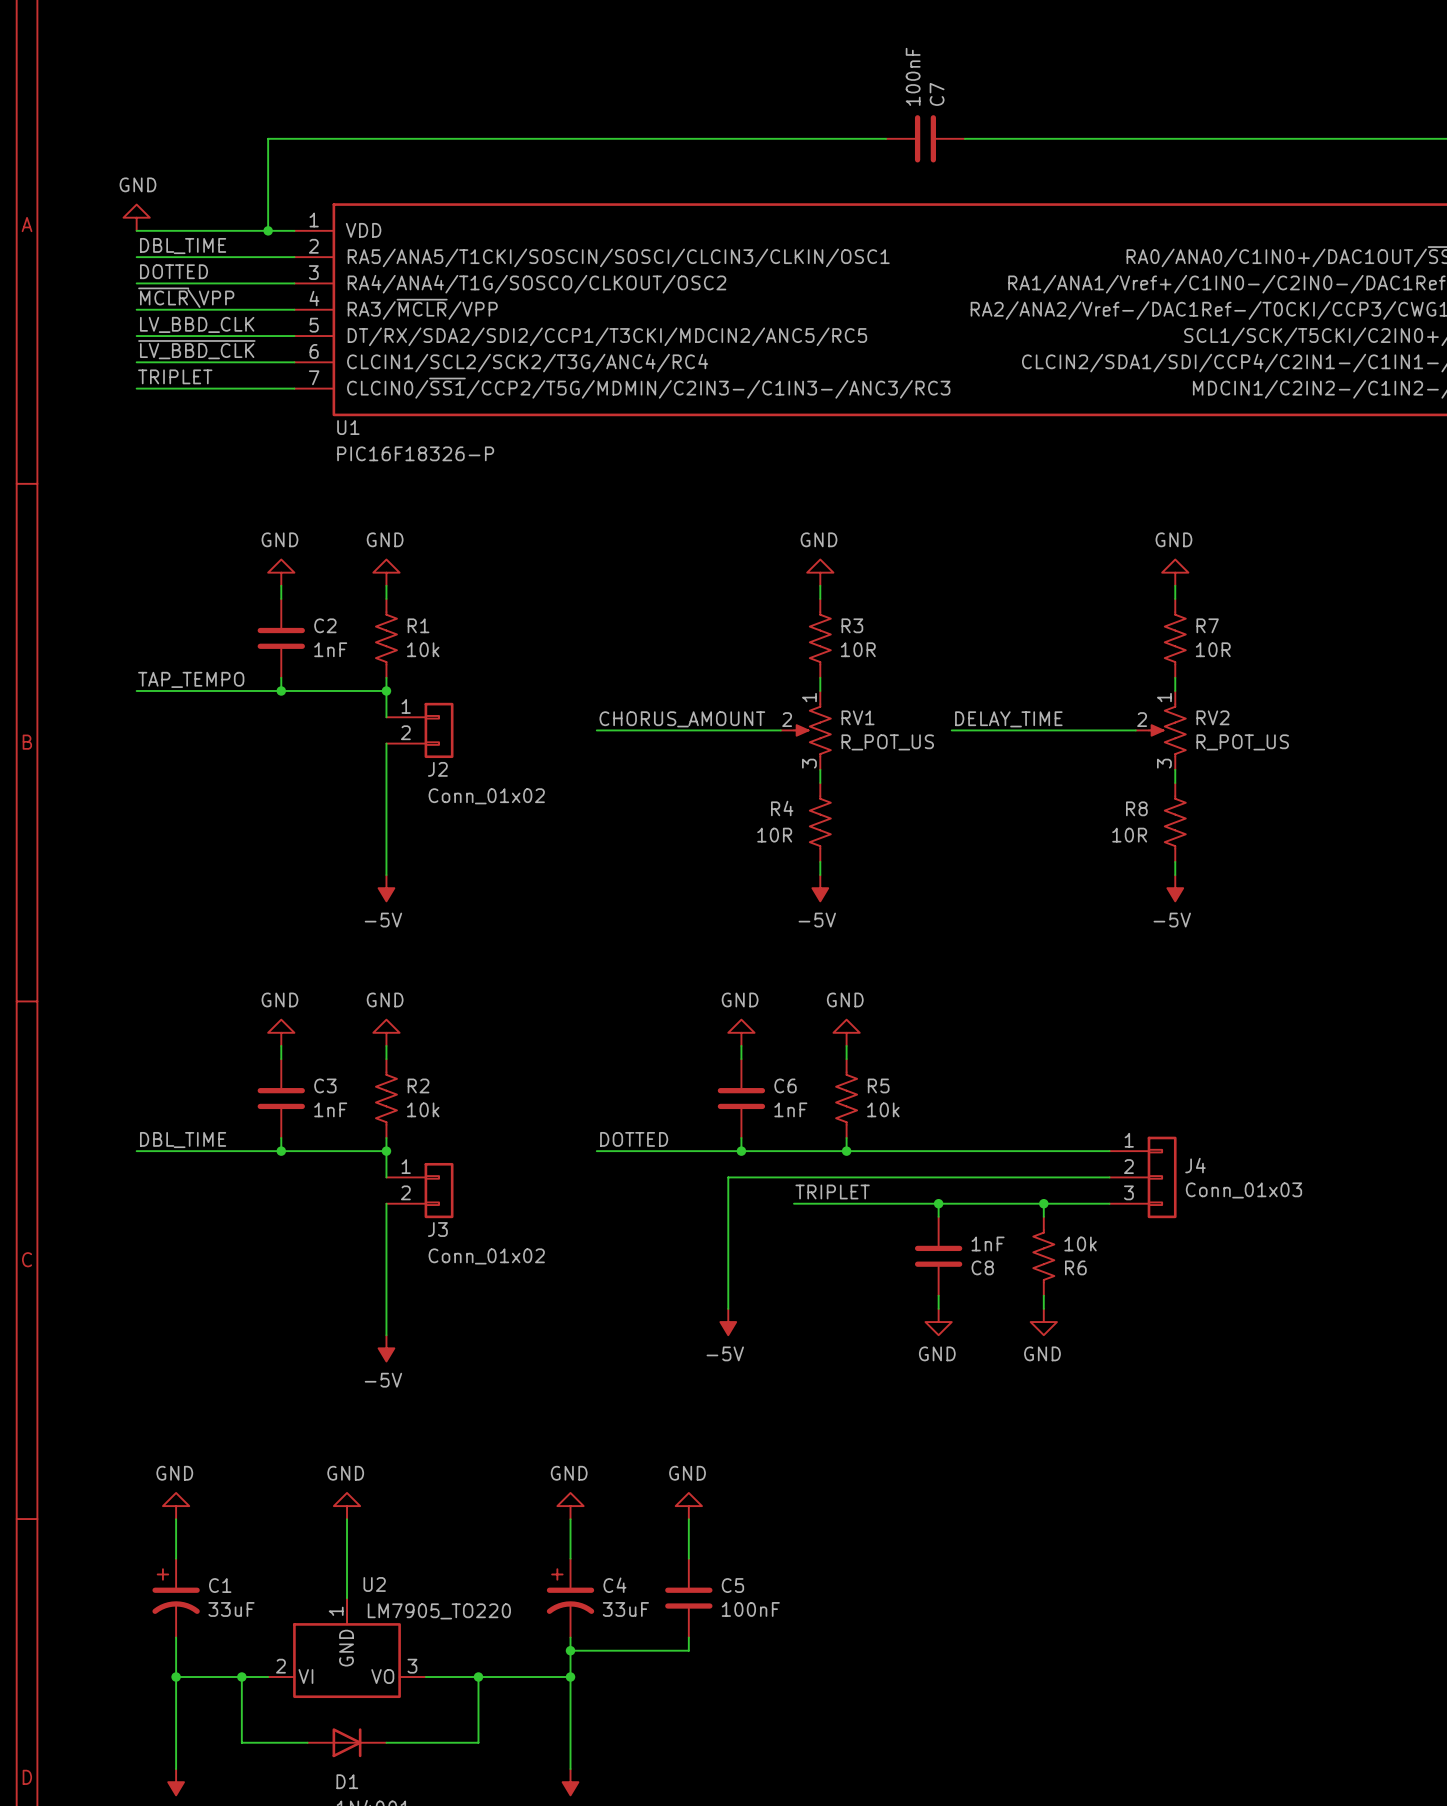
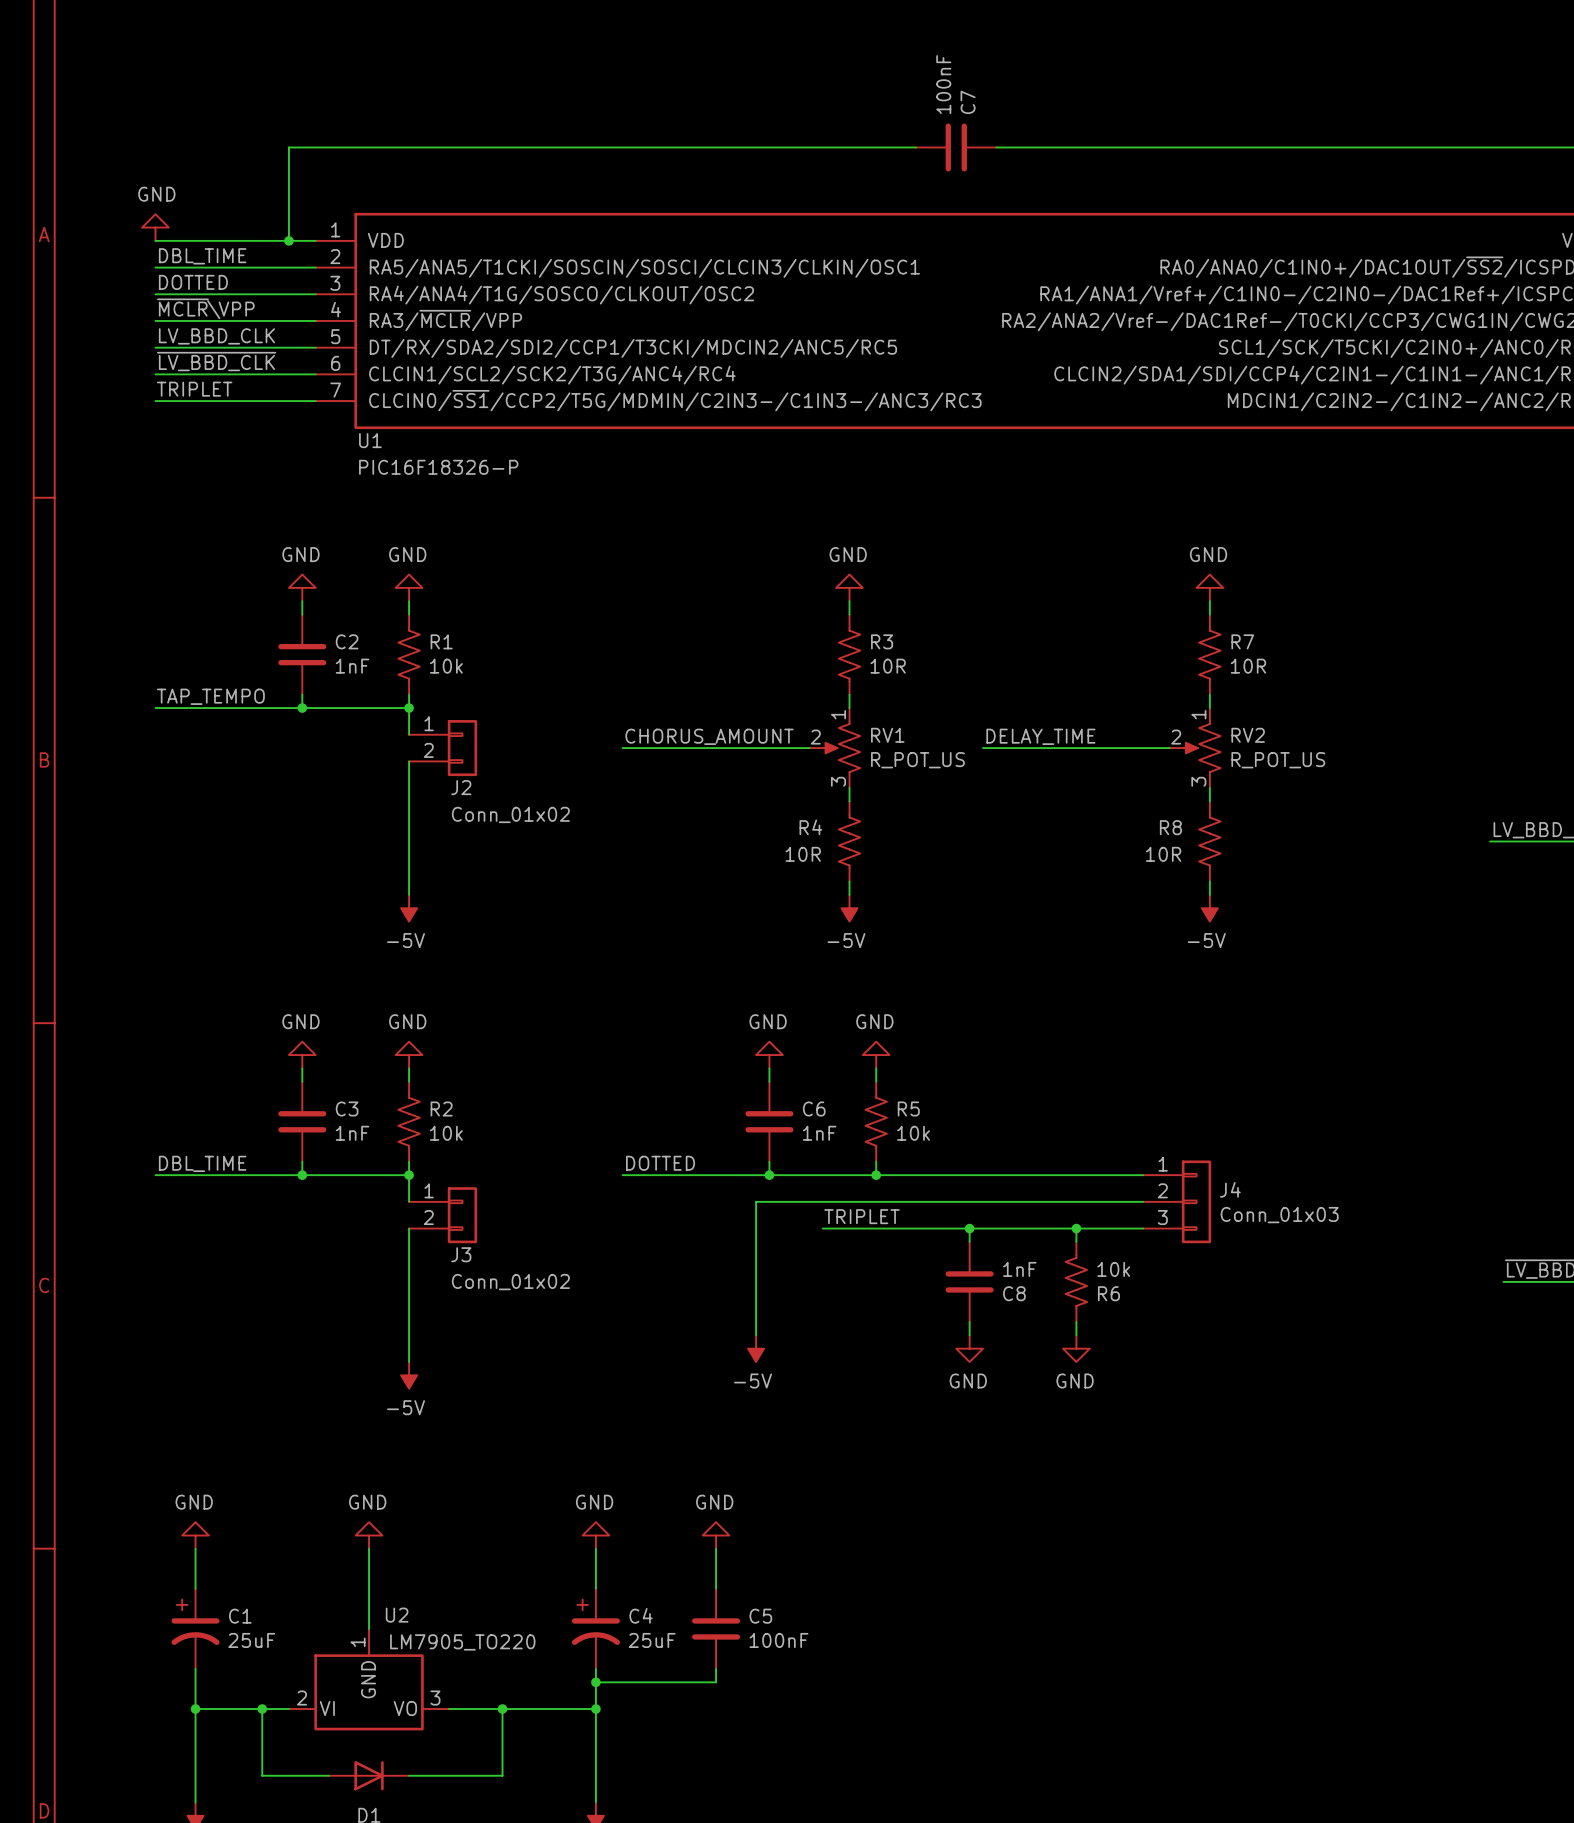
C1 value: 33uF (231, 1609) -> 25uF (251, 1640)
C4 value: 33uF (625, 1609) -> 25uF (652, 1640)

